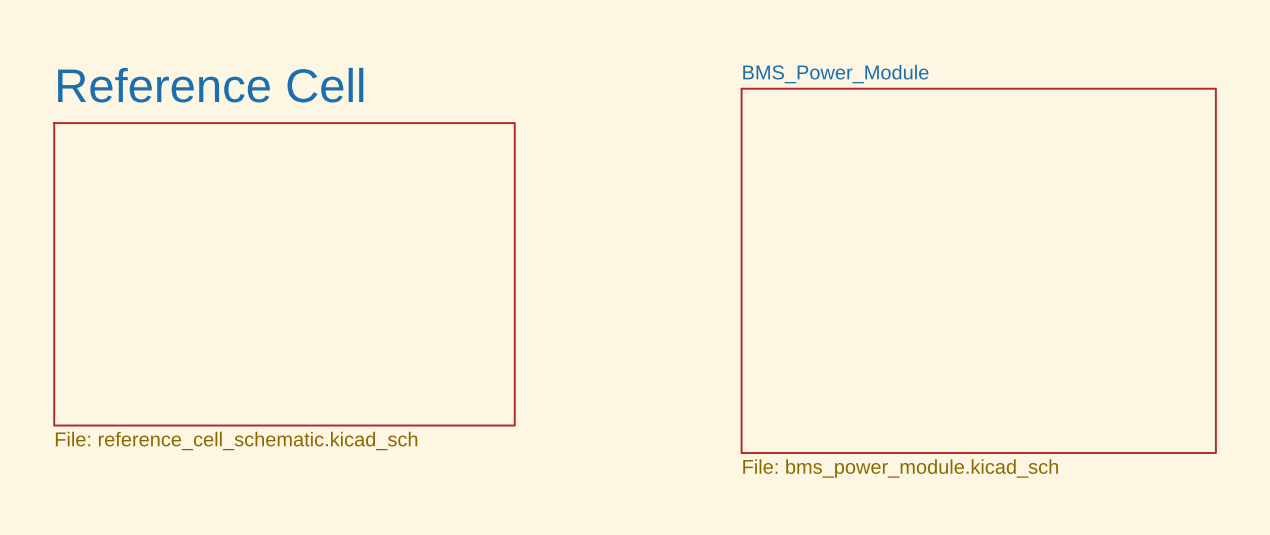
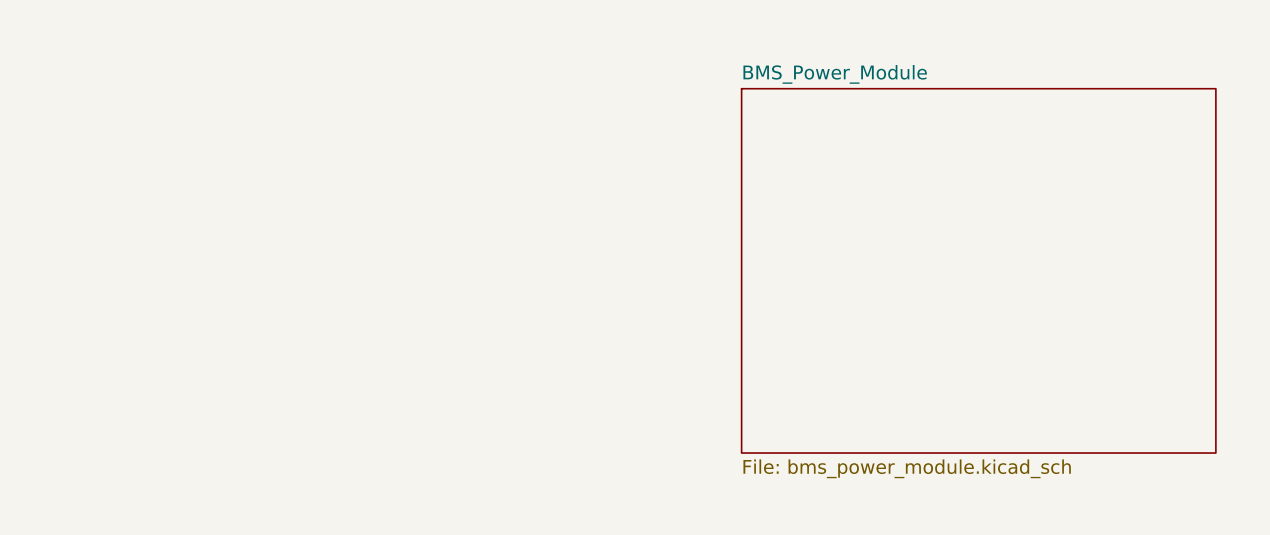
sheet Reference Cell: File: reference_cell_schematic.kicad_sch (284, 274) -> none

